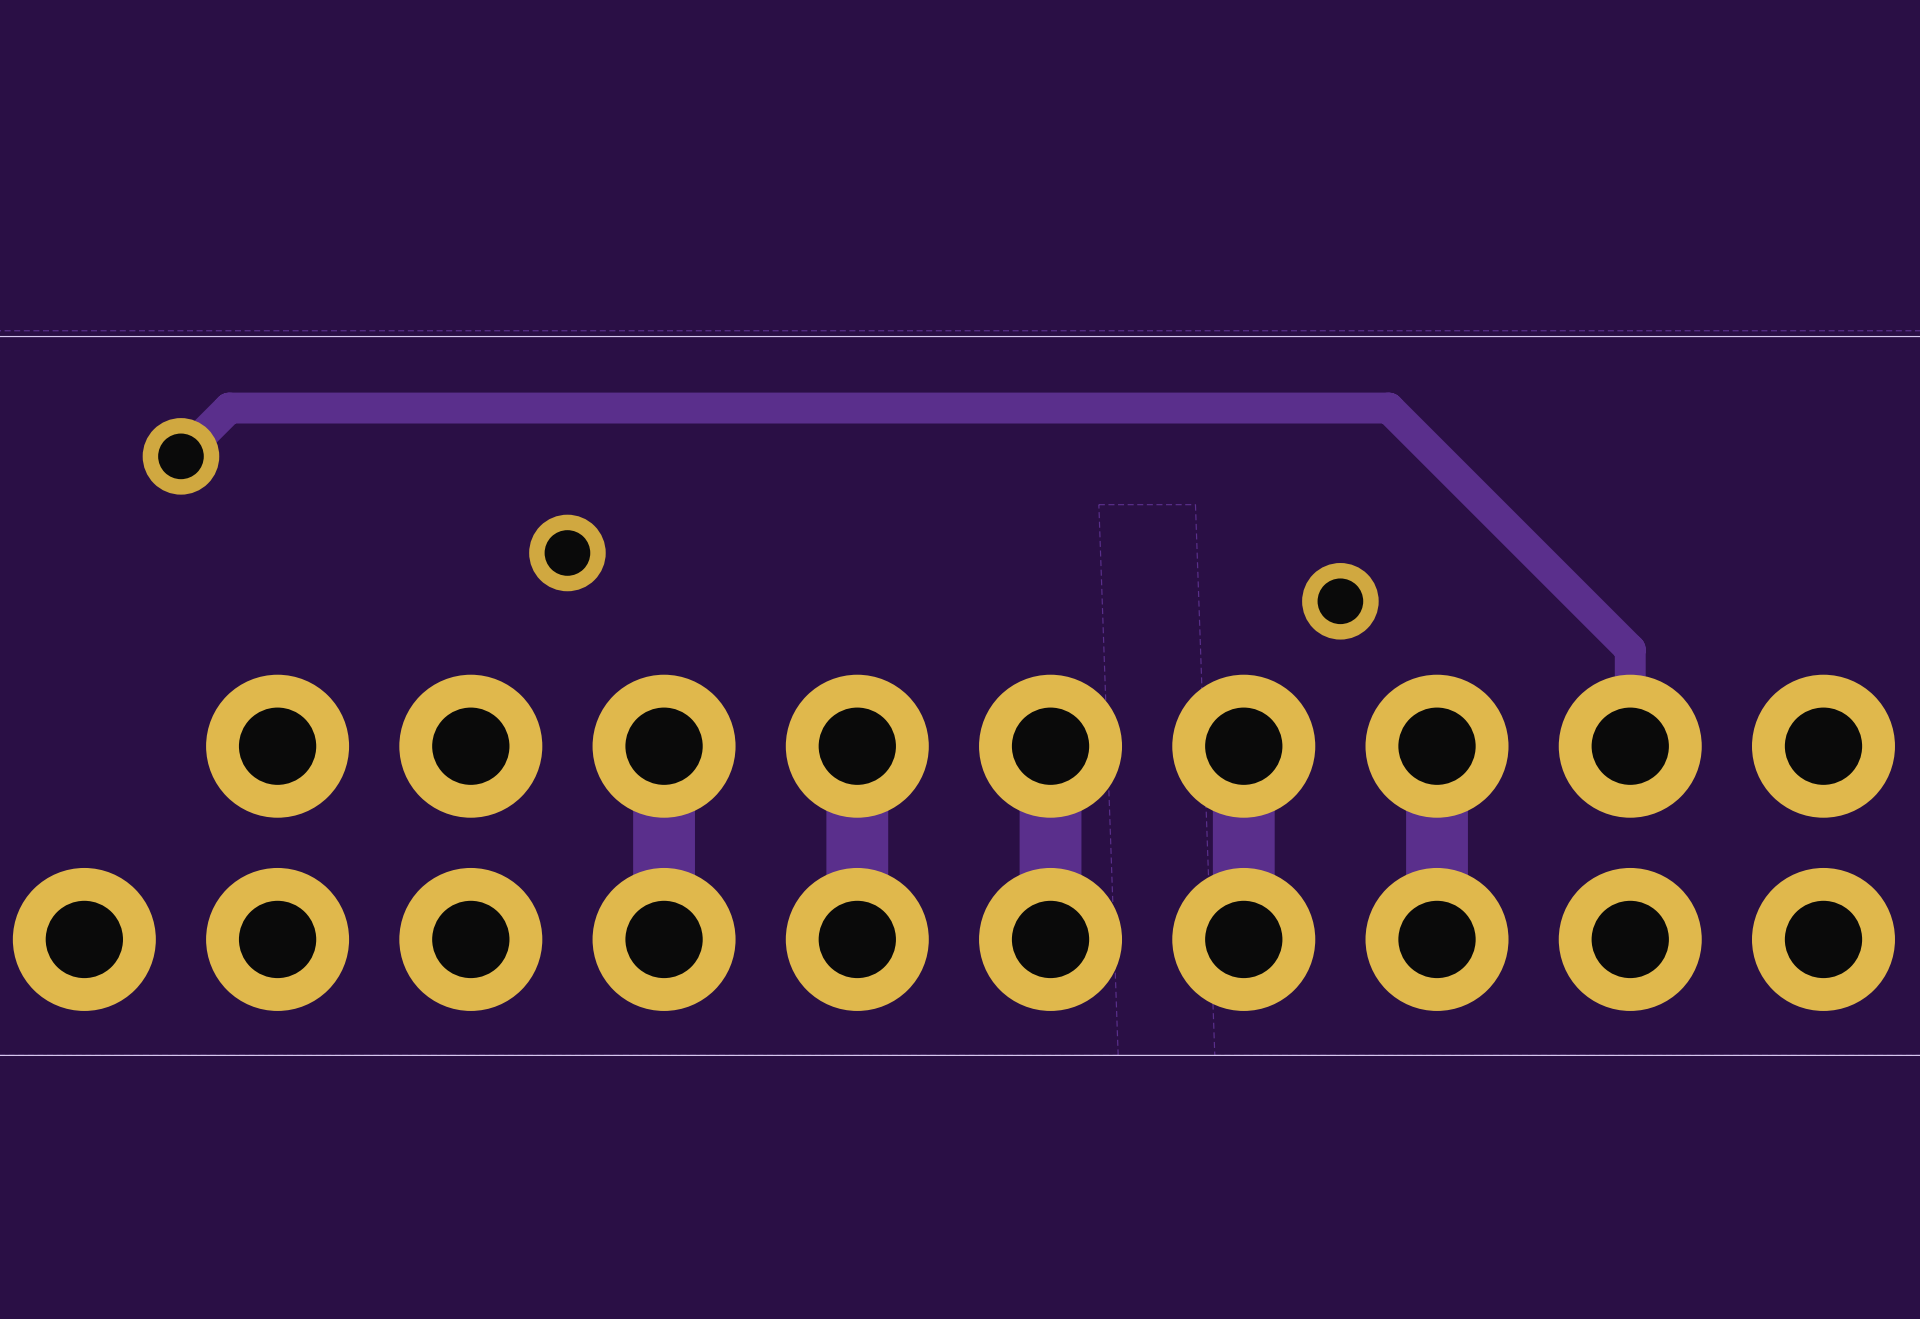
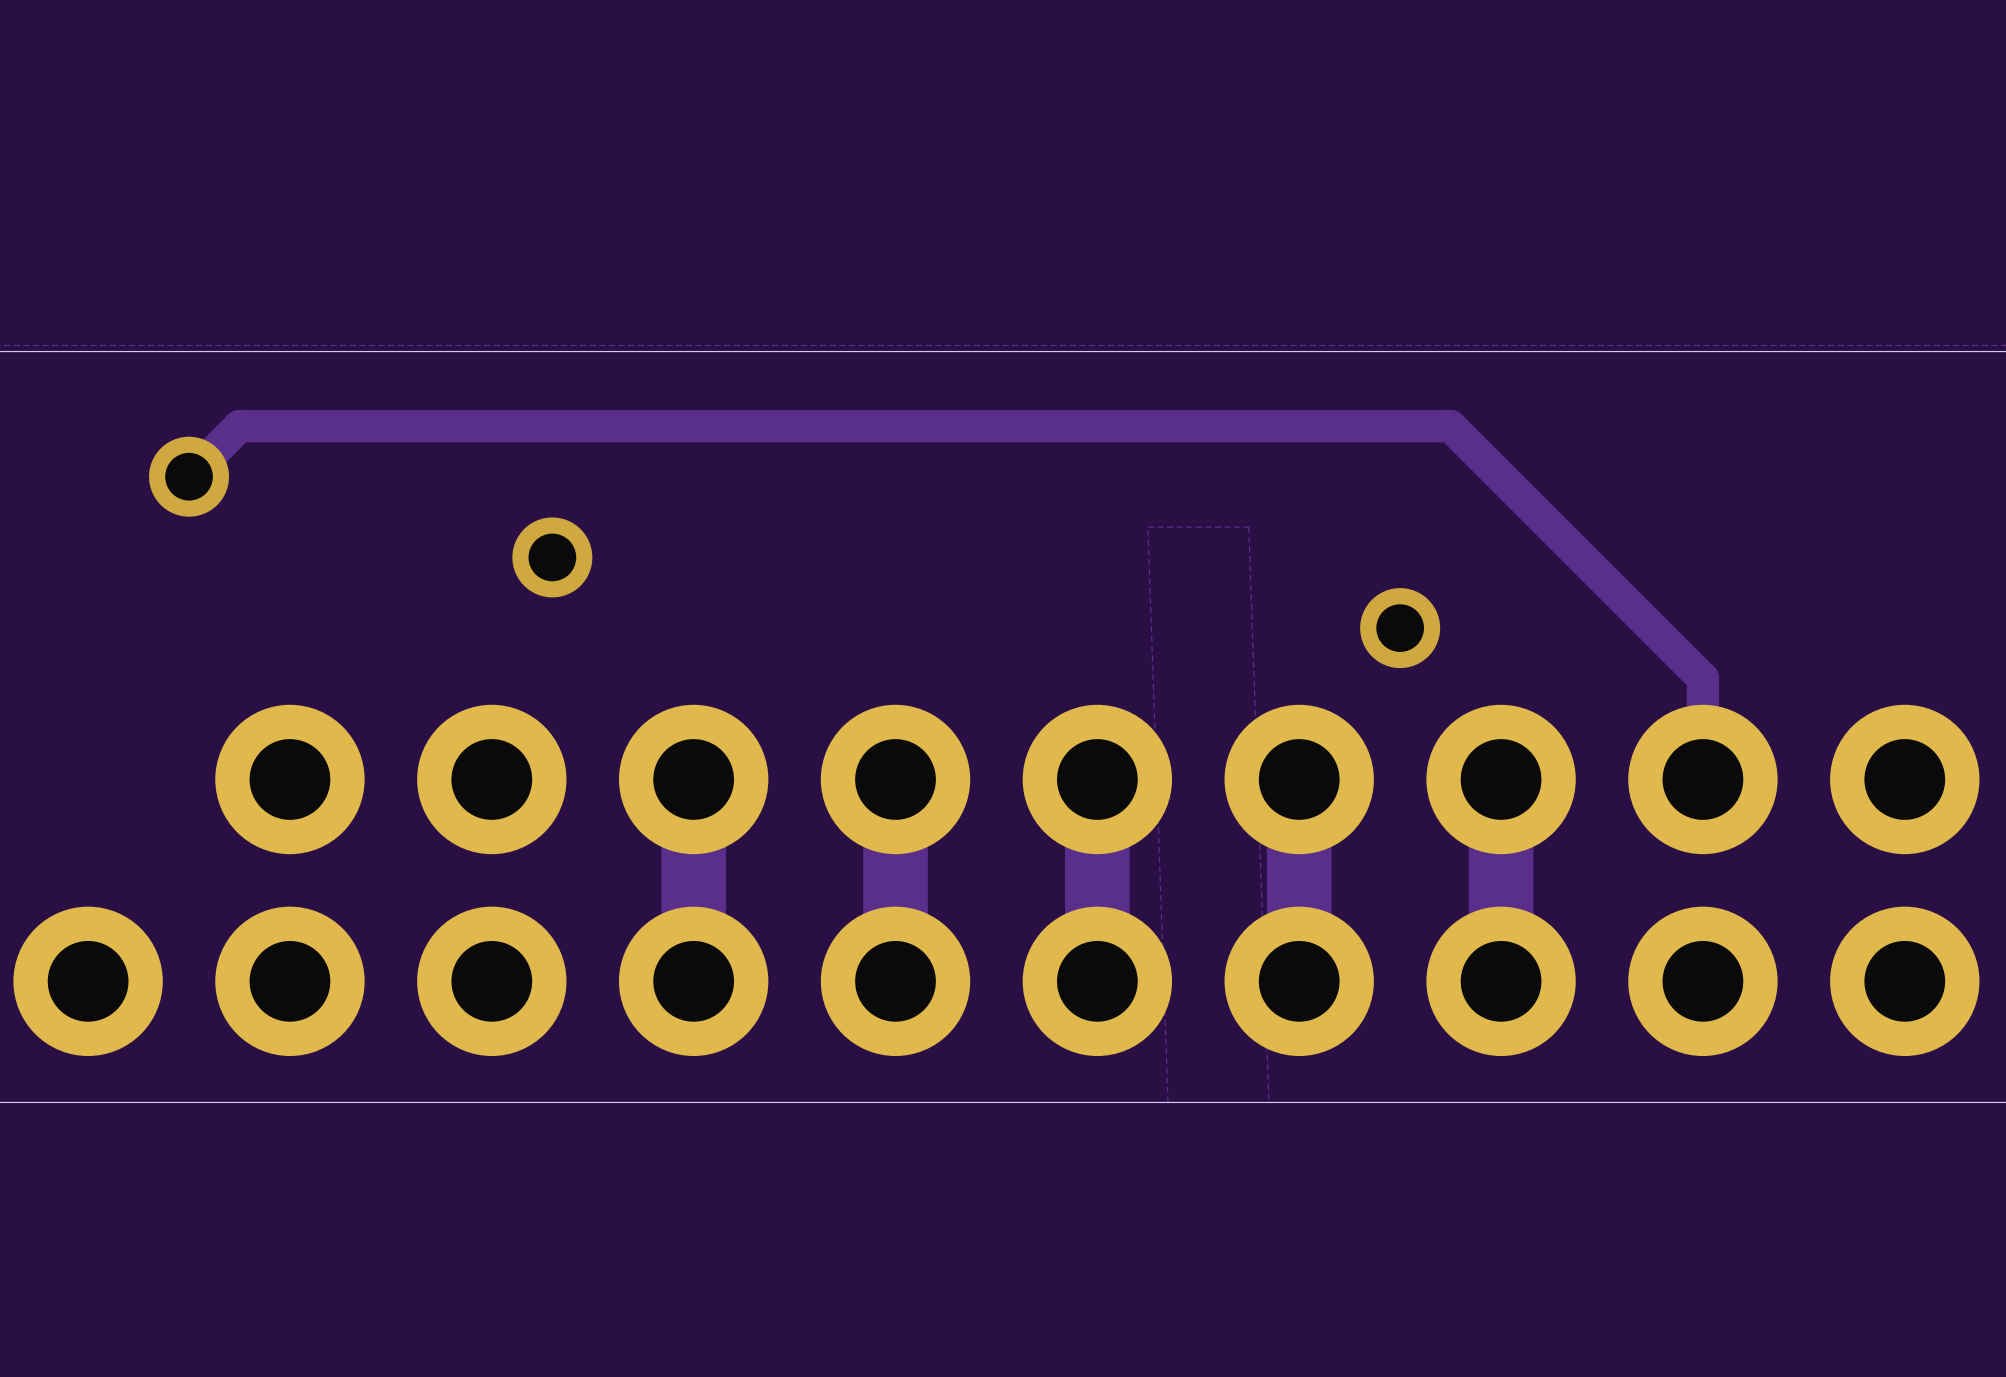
via position: (567, 552) -> (552, 557)

